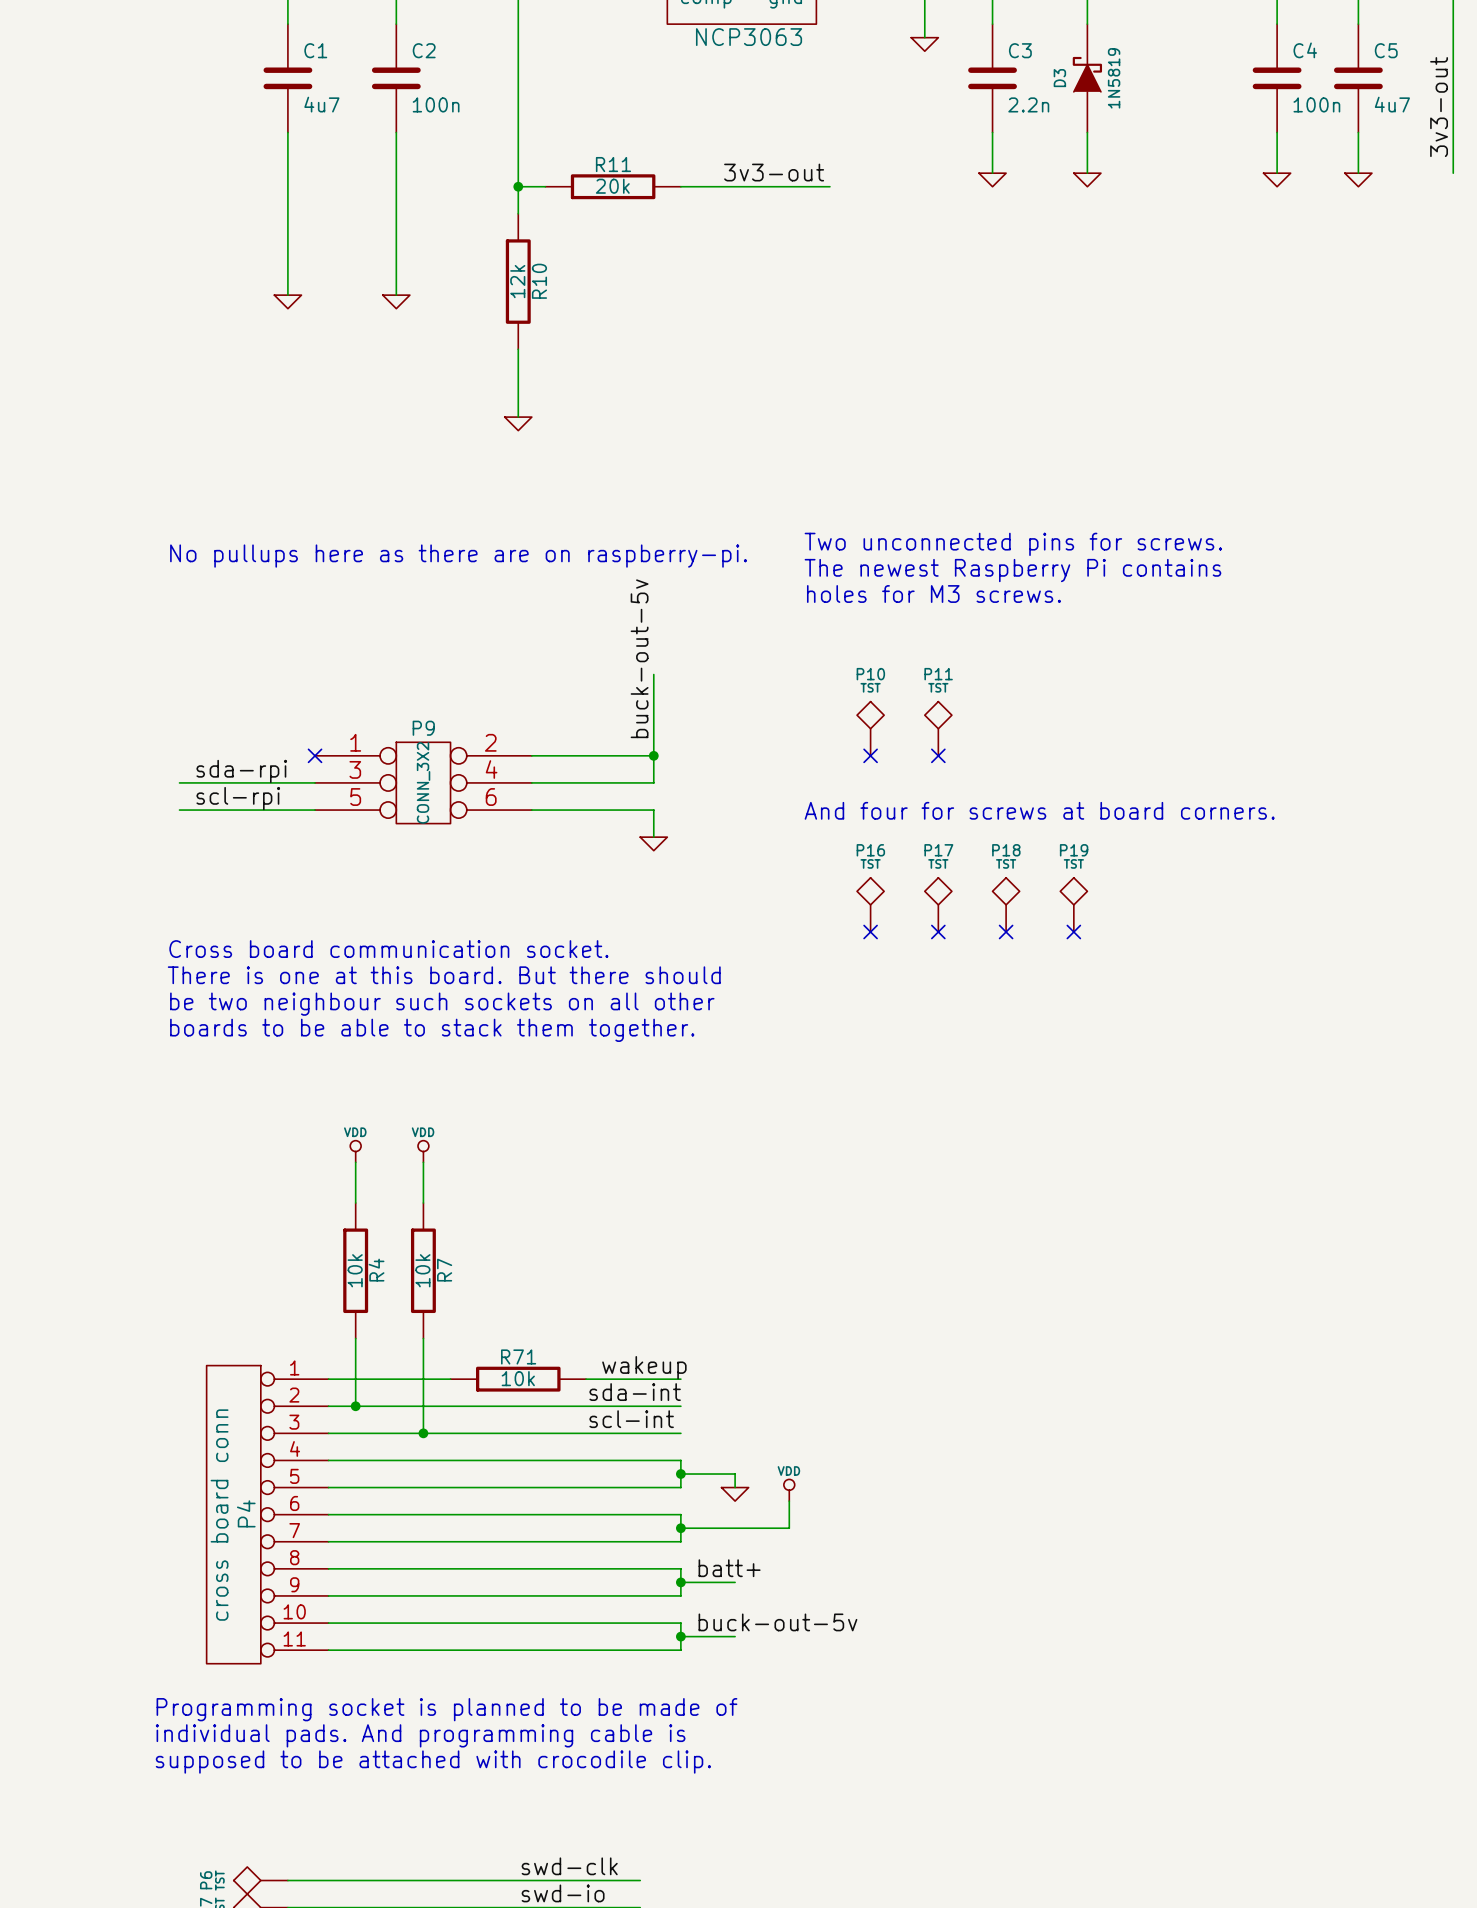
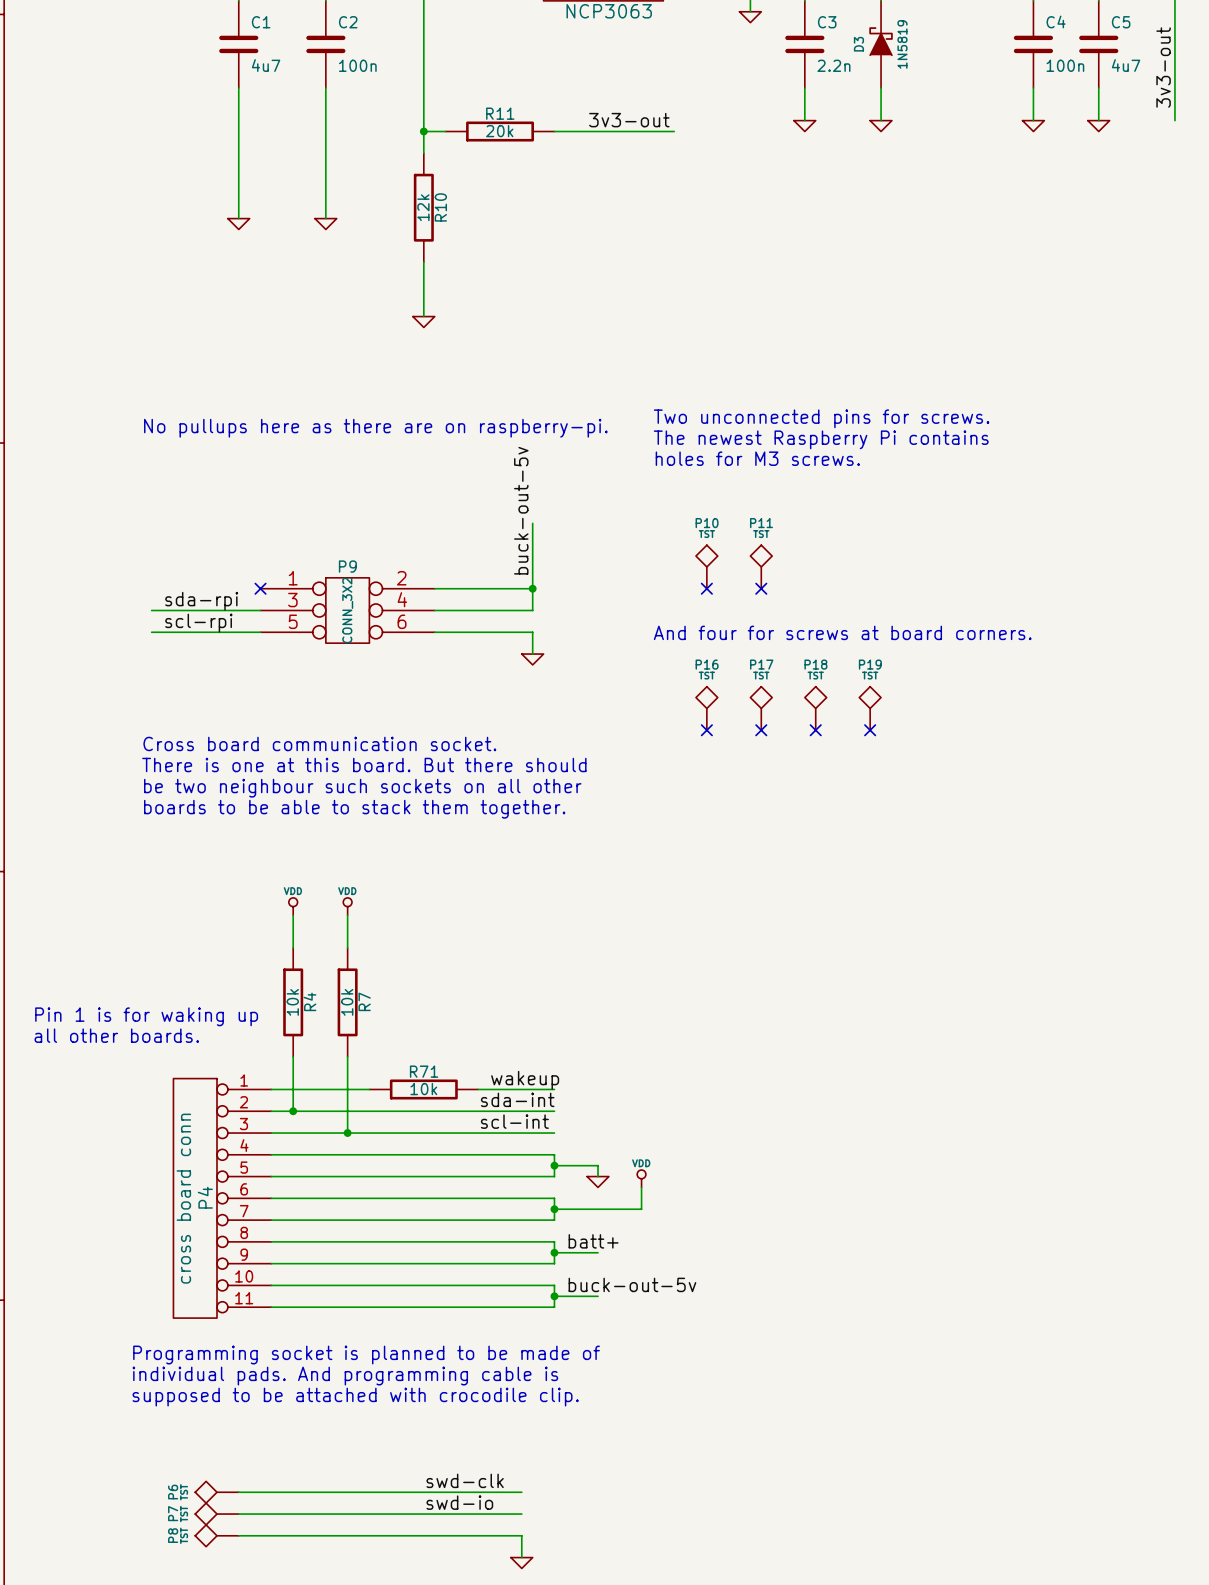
text: none -> Pin 1 is for waking up (146, 1016)
text: none -> all other boards. (116, 1035)

